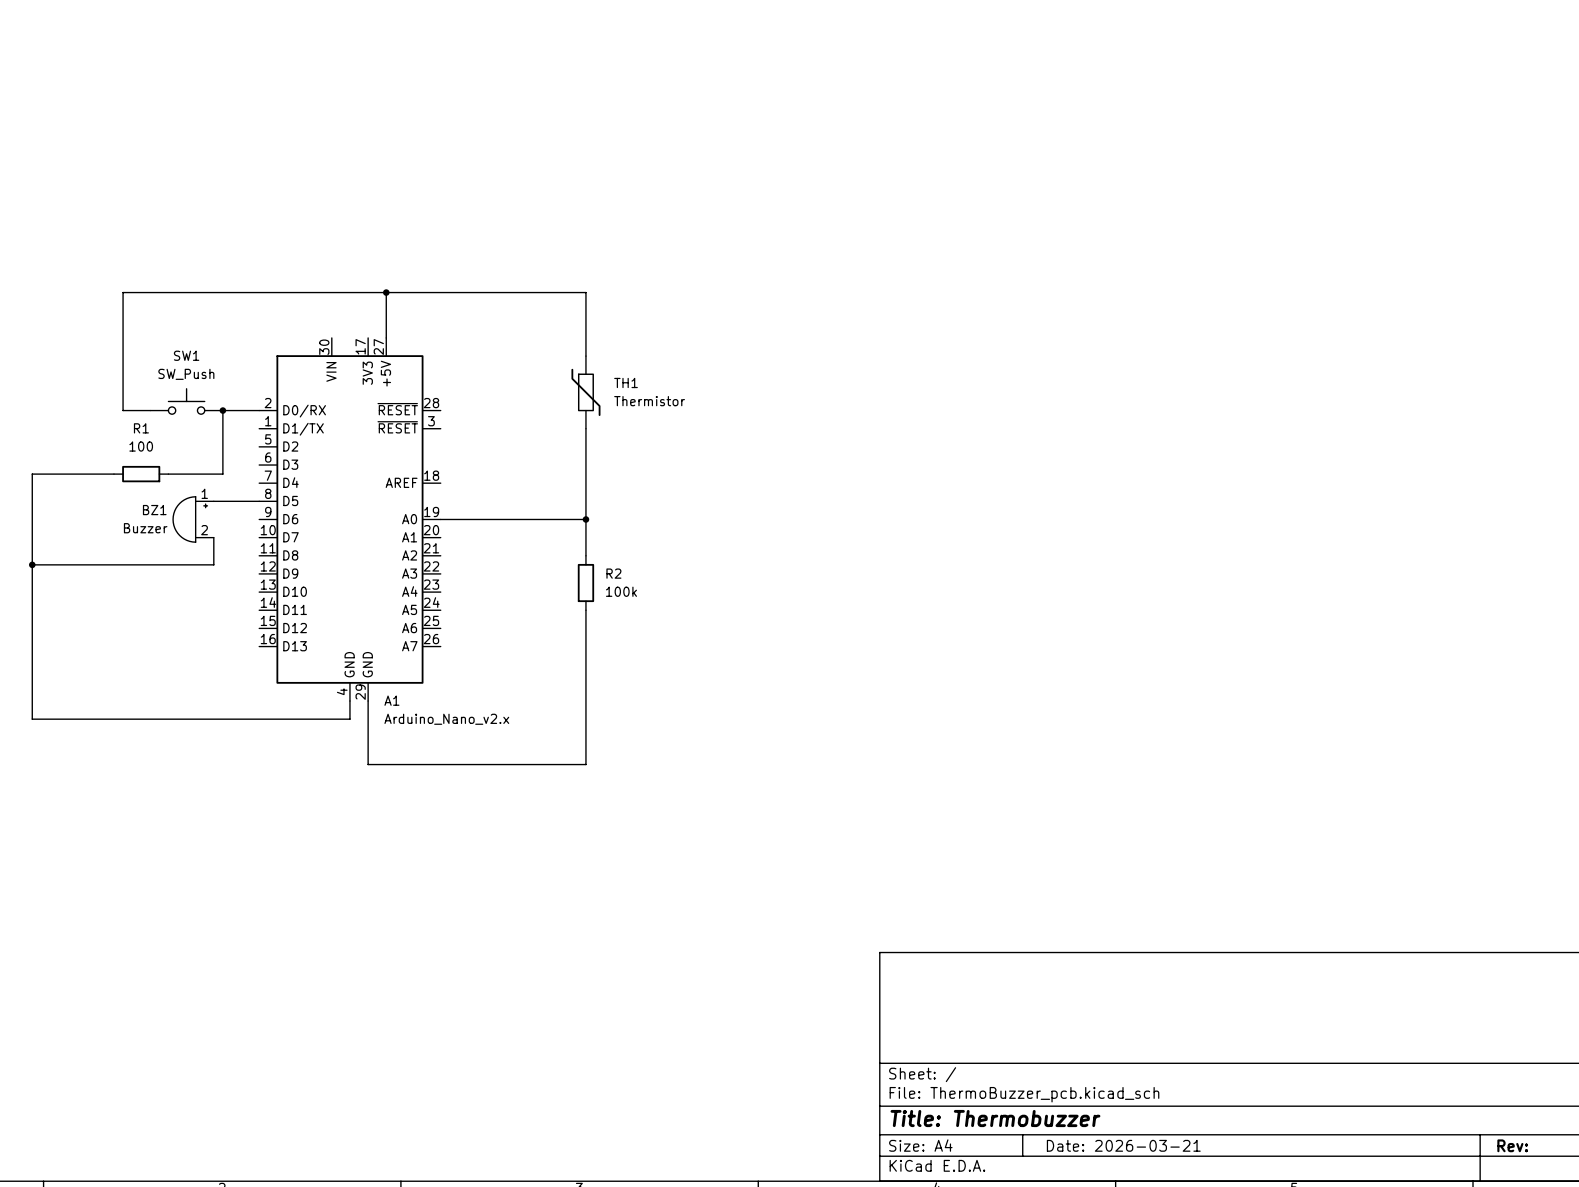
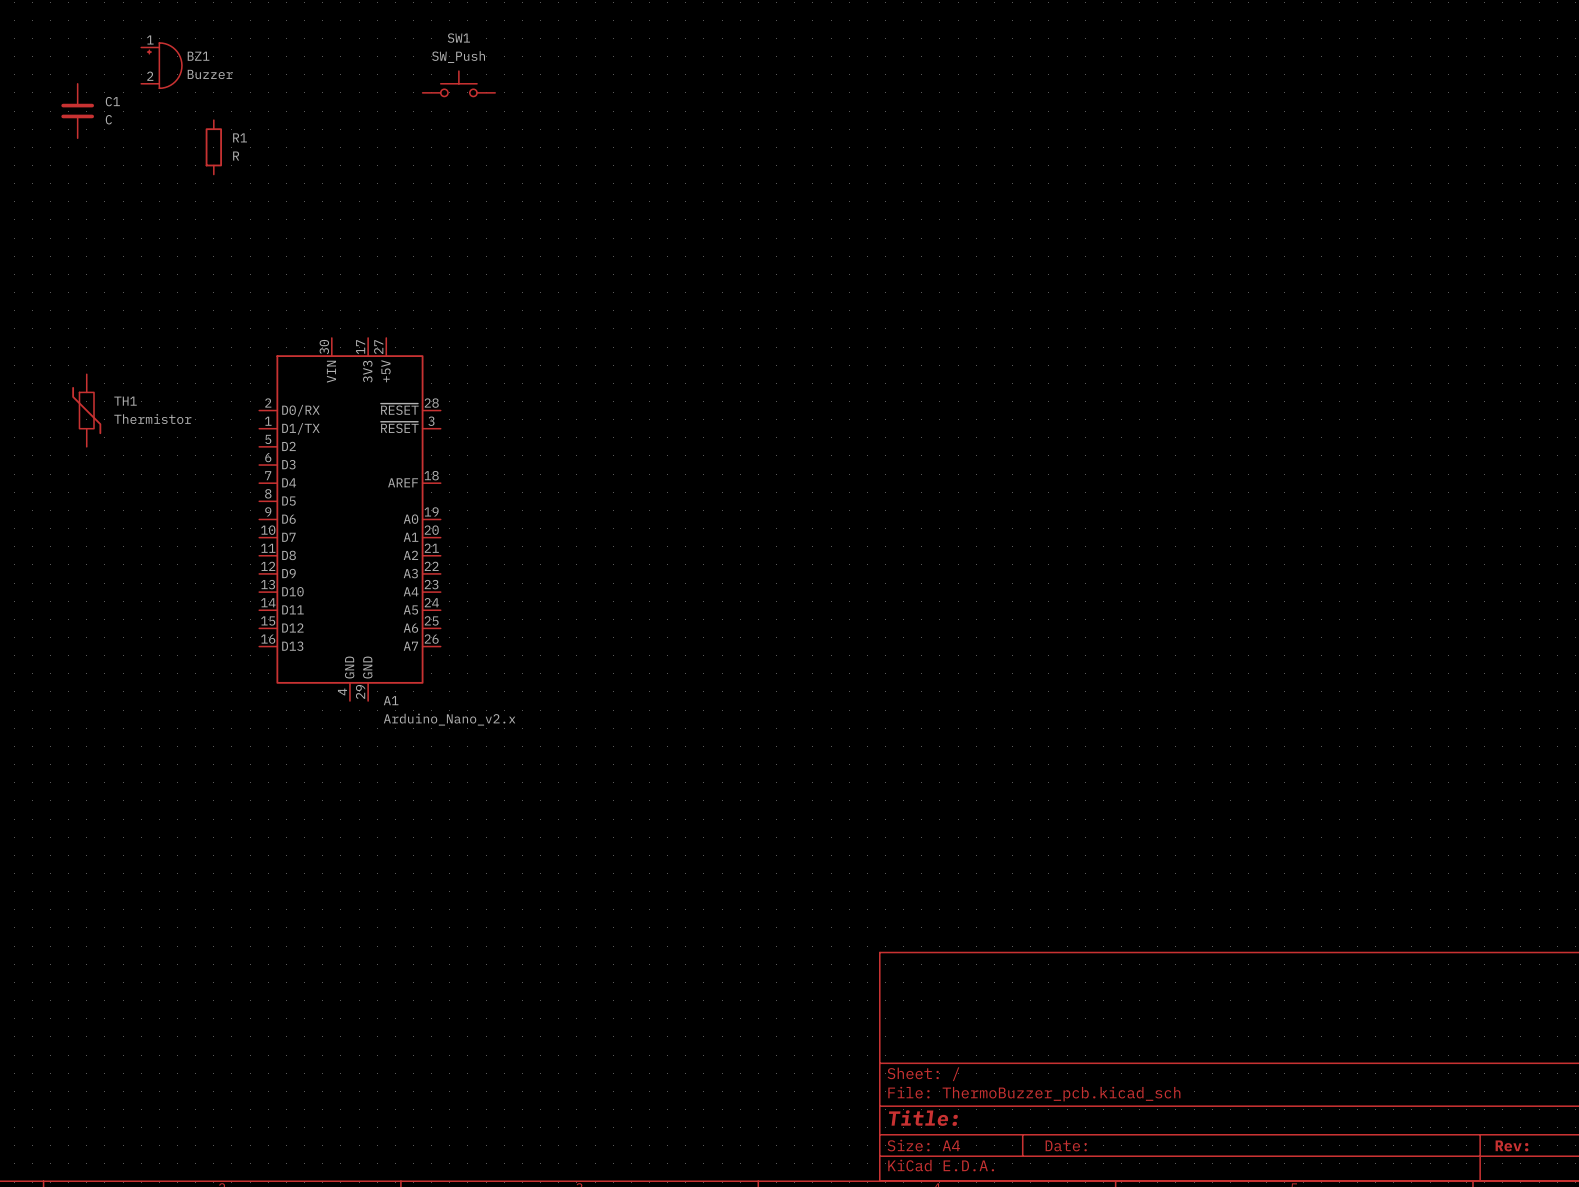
C1: none -> C (77, 111)
wire: (386, 292) (386, 337) -> none
junction: (386, 292) -> none
wire: (585, 356) (585, 292) (123, 292) (123, 410) (150, 410) -> none
TH1 position: (585, 392) -> (86, 410)
SW1 position: (186, 401) -> (458, 83)
junction: (222, 410) -> none
wire: (259, 410) (222, 410) (222, 474) (168, 474) -> none
R1 name position: R1 (141, 428) -> R1 (240, 137)
wire: (585, 428) (585, 555) -> none
R1 value: 100 (141, 446) -> R (236, 156)
wire: (113, 474) (32, 474) (32, 719) (349, 719) (349, 701) -> none
R1 rotation: 0° (141, 474) -> 90° clockwise (213, 147)
R1 position: (141, 474) -> (213, 147)
wire: (213, 501) (259, 501) -> none
BZ1 flip: as is (190, 519) -> left-right (164, 65)
BZ1 position: (193, 519) -> (161, 65)
wire: (440, 519) (585, 519) -> none
junction: (585, 519) -> none
wire: (213, 537) (213, 564) (32, 564) -> none
junction: (32, 564) -> none
R2: 100k (585, 583) -> none
wire: (585, 610) (585, 764) (368, 764) (368, 701) -> none
title block: Title: Thermobuzzer (995, 1118) -> Title: (923, 1118)
title block: Date: 2026-03-21 (1123, 1145) -> Date: (1066, 1145)

